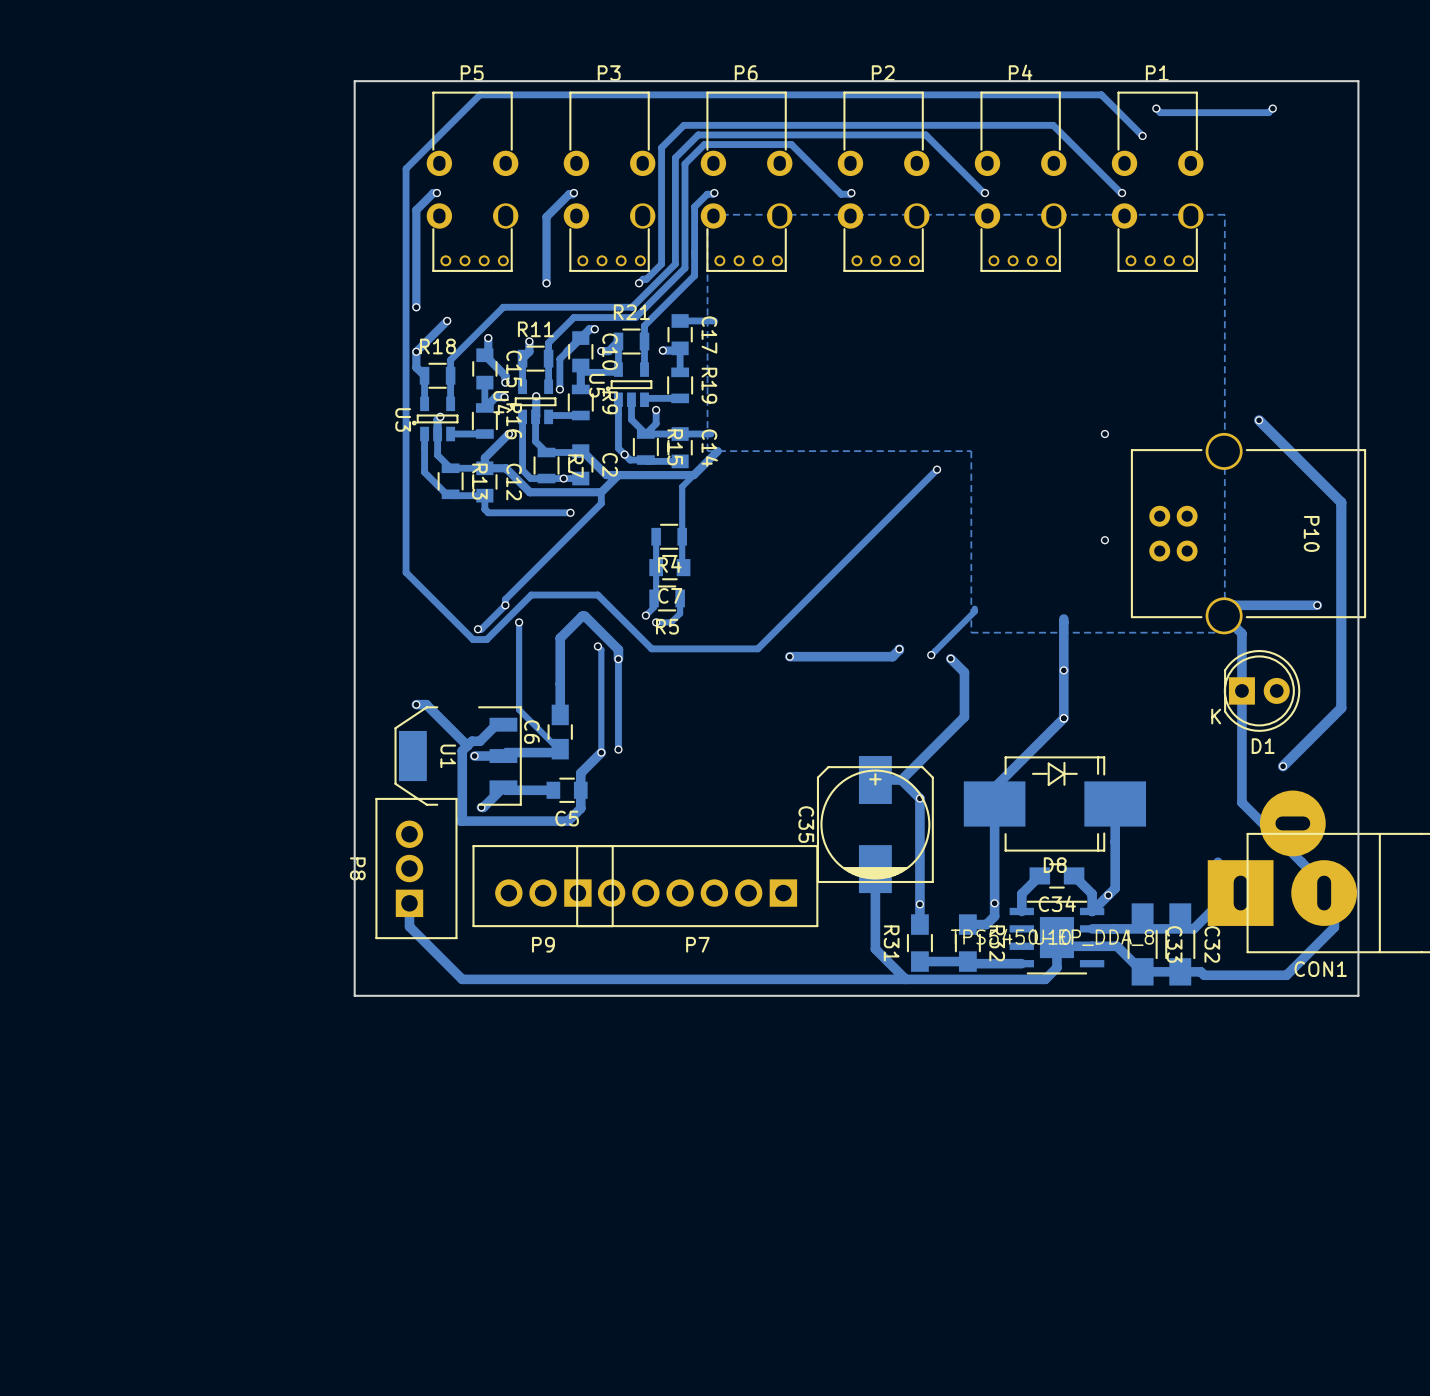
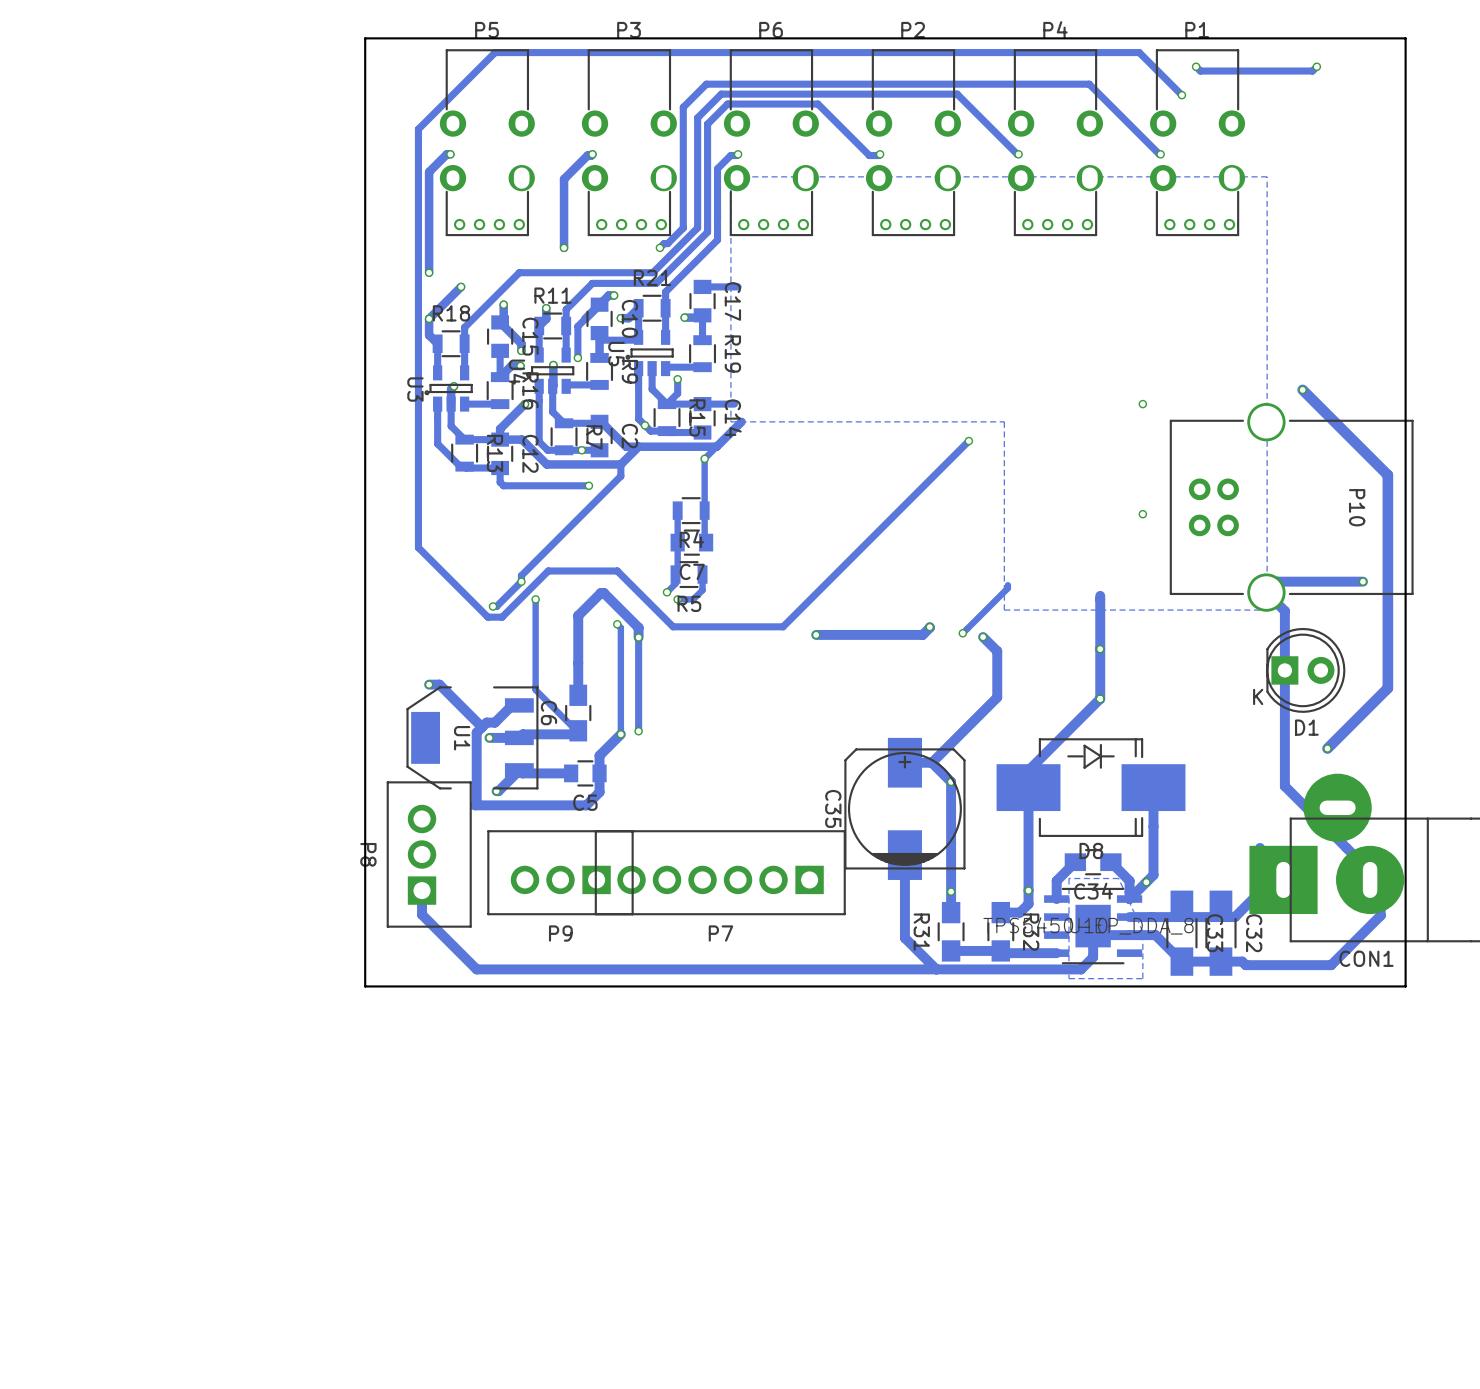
via: none -> (704, 458)
zone outline: none -> (1118, 878) (1068, 878) (1068, 978) (1142, 978) (1142, 931) (1118, 878)

